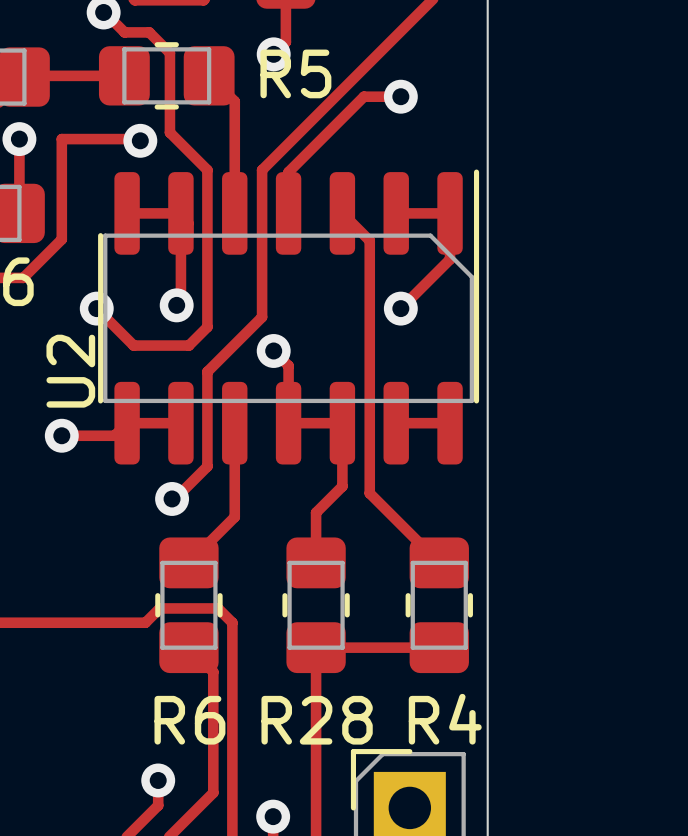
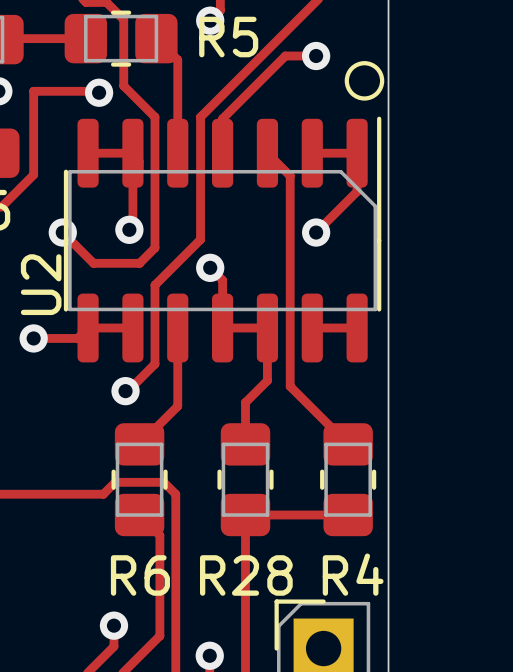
drawing: none -> [344, 61, 385, 101]

